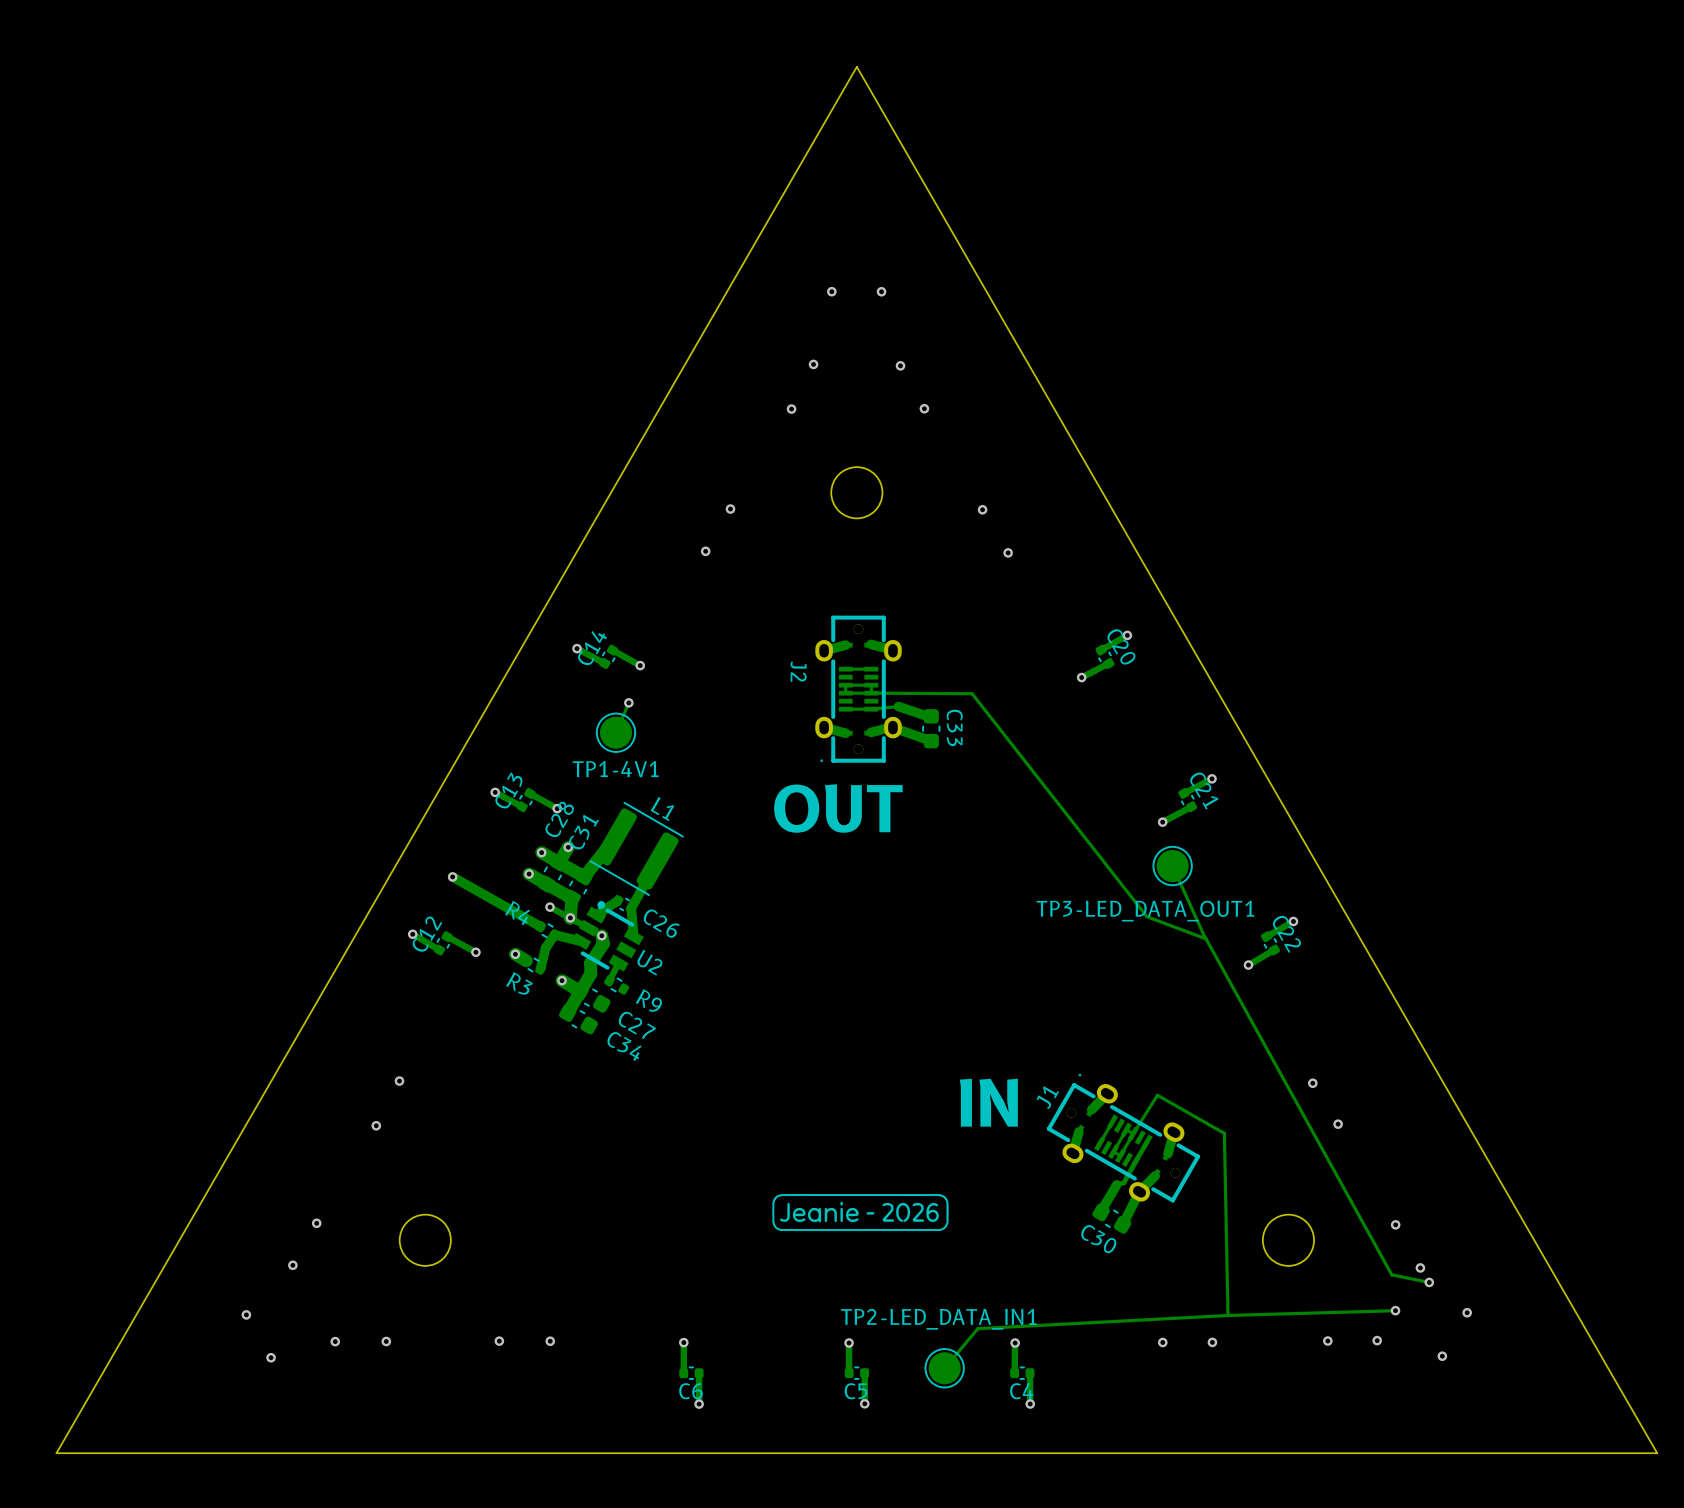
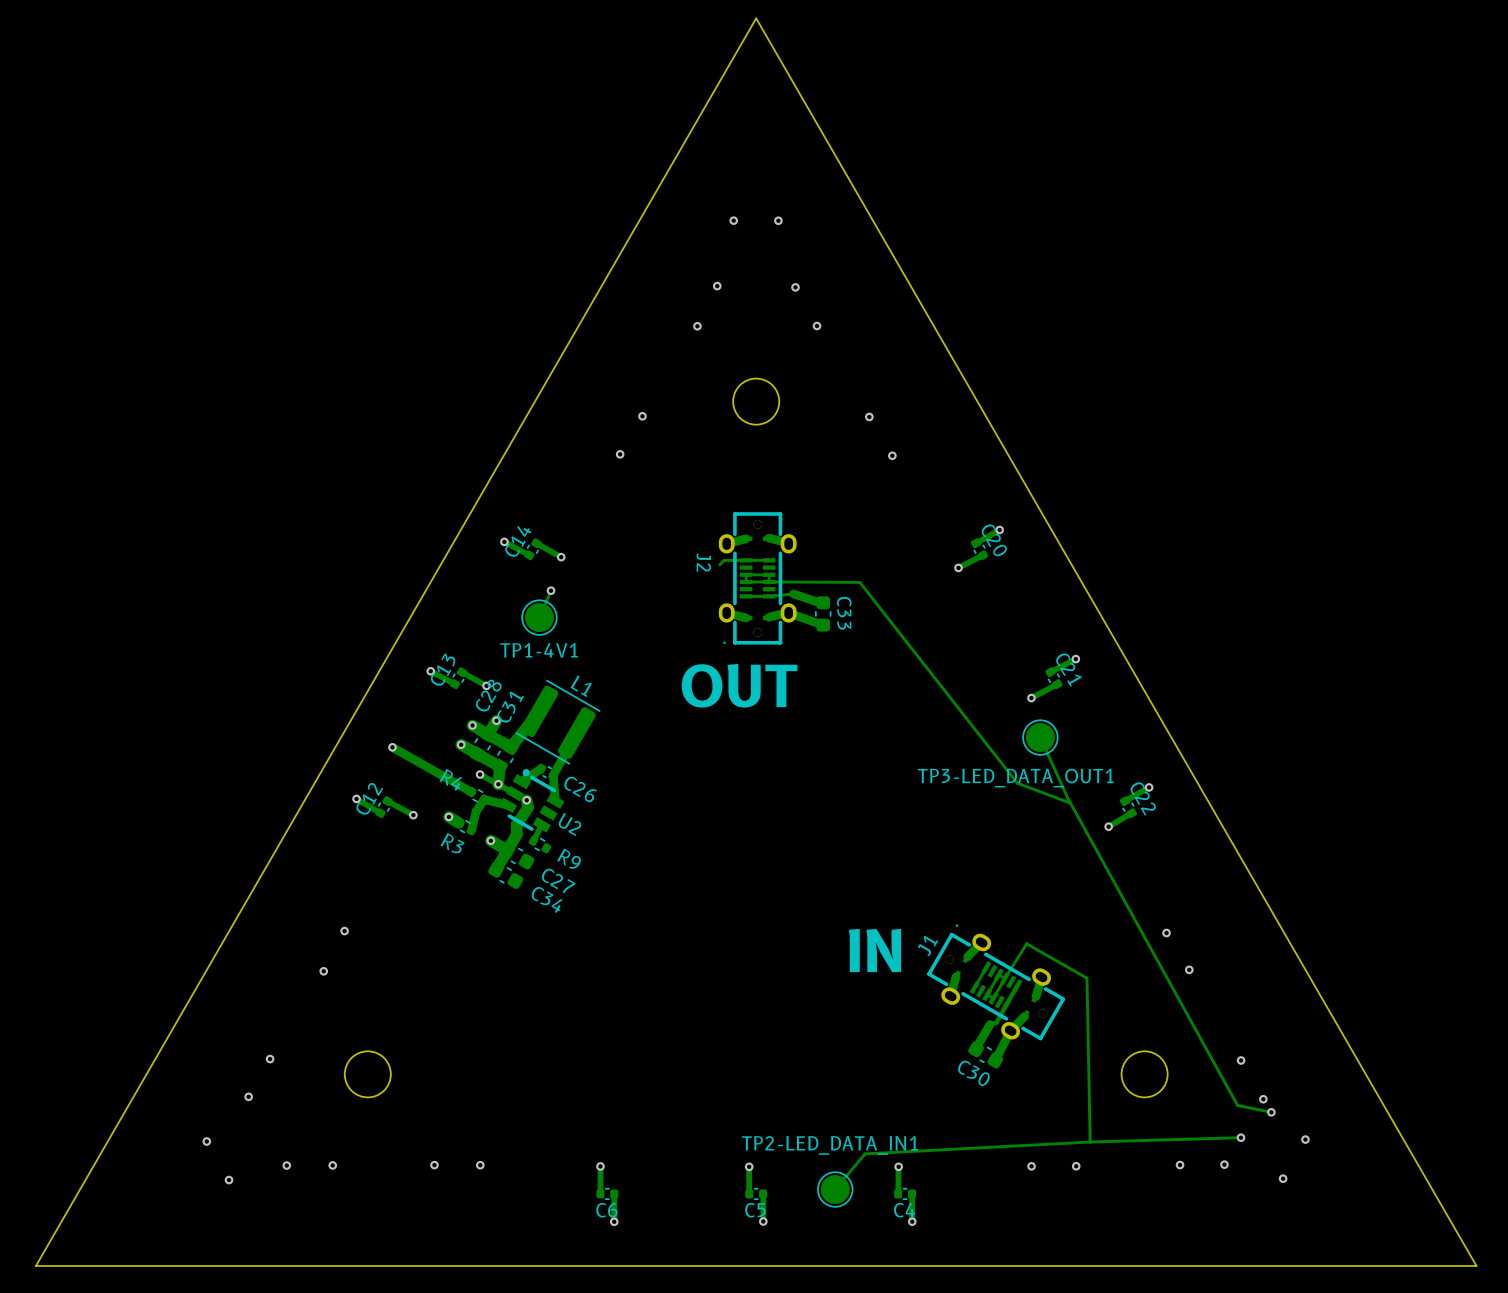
track: none -> (746, 560) (724, 560) (719, 564)
drawing: [772, 1194, 949, 1232] -> none

